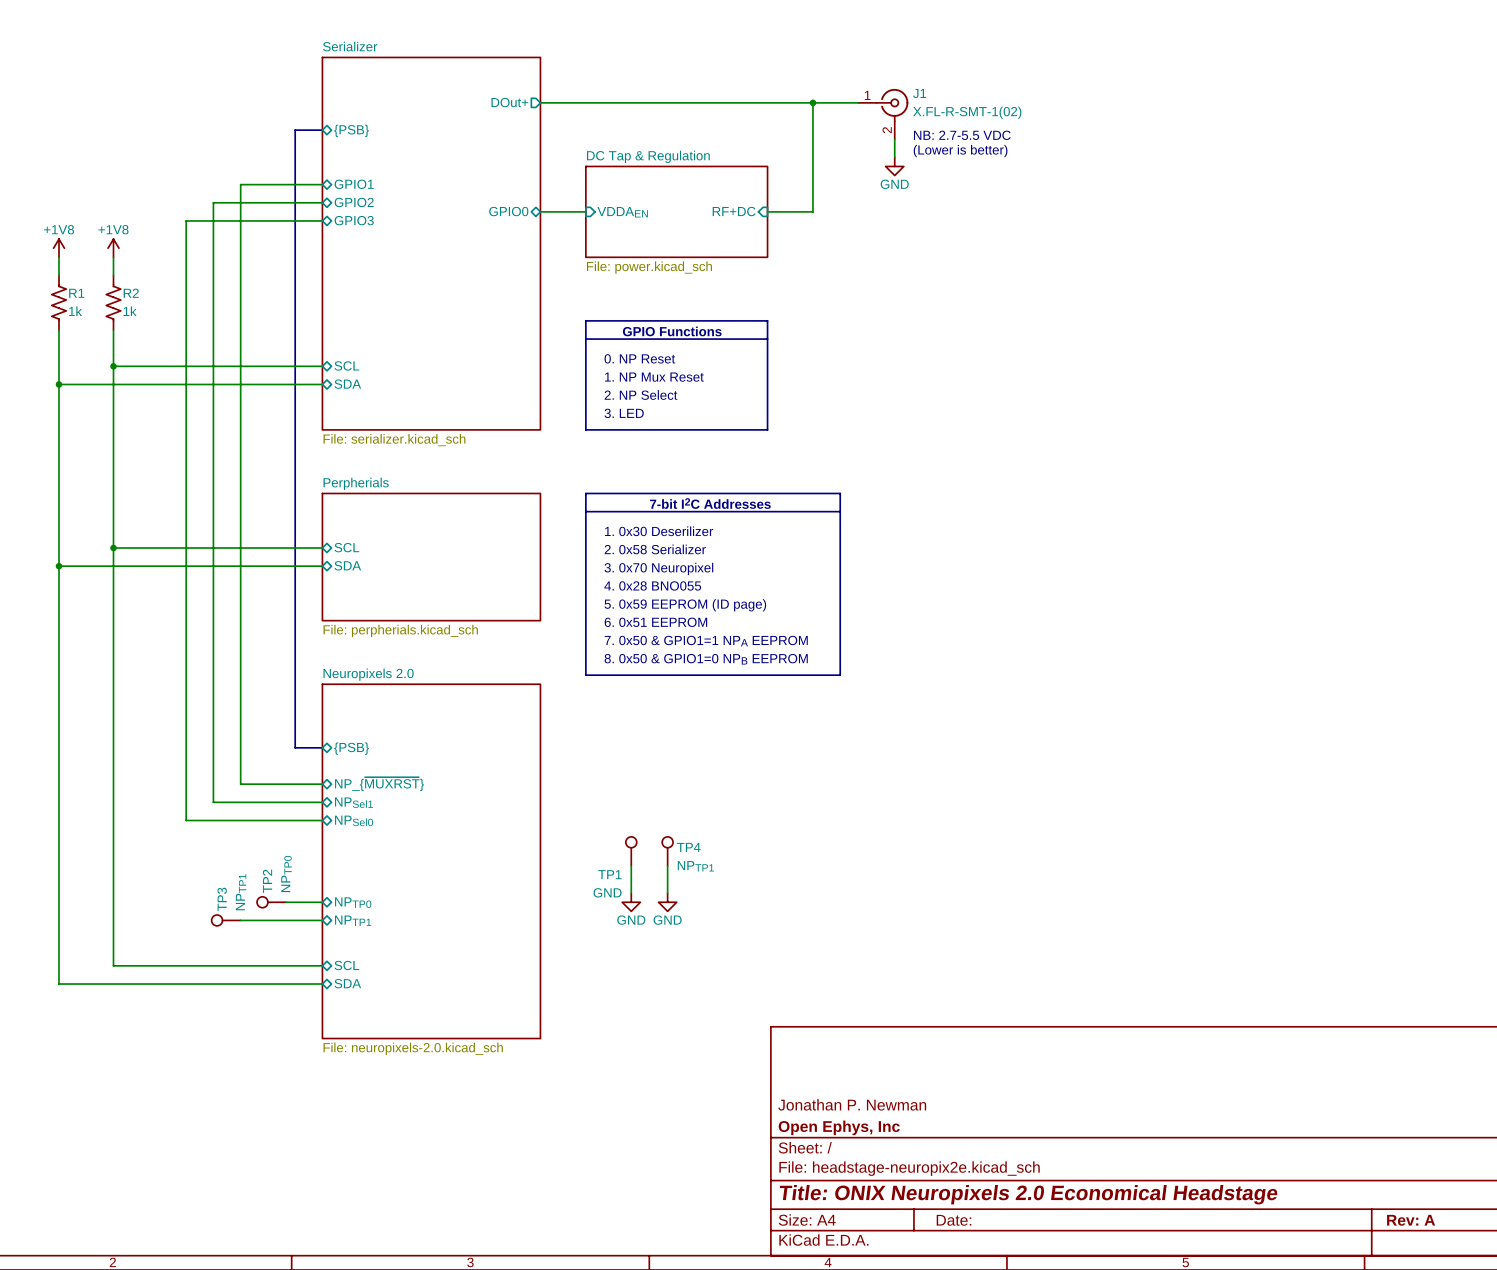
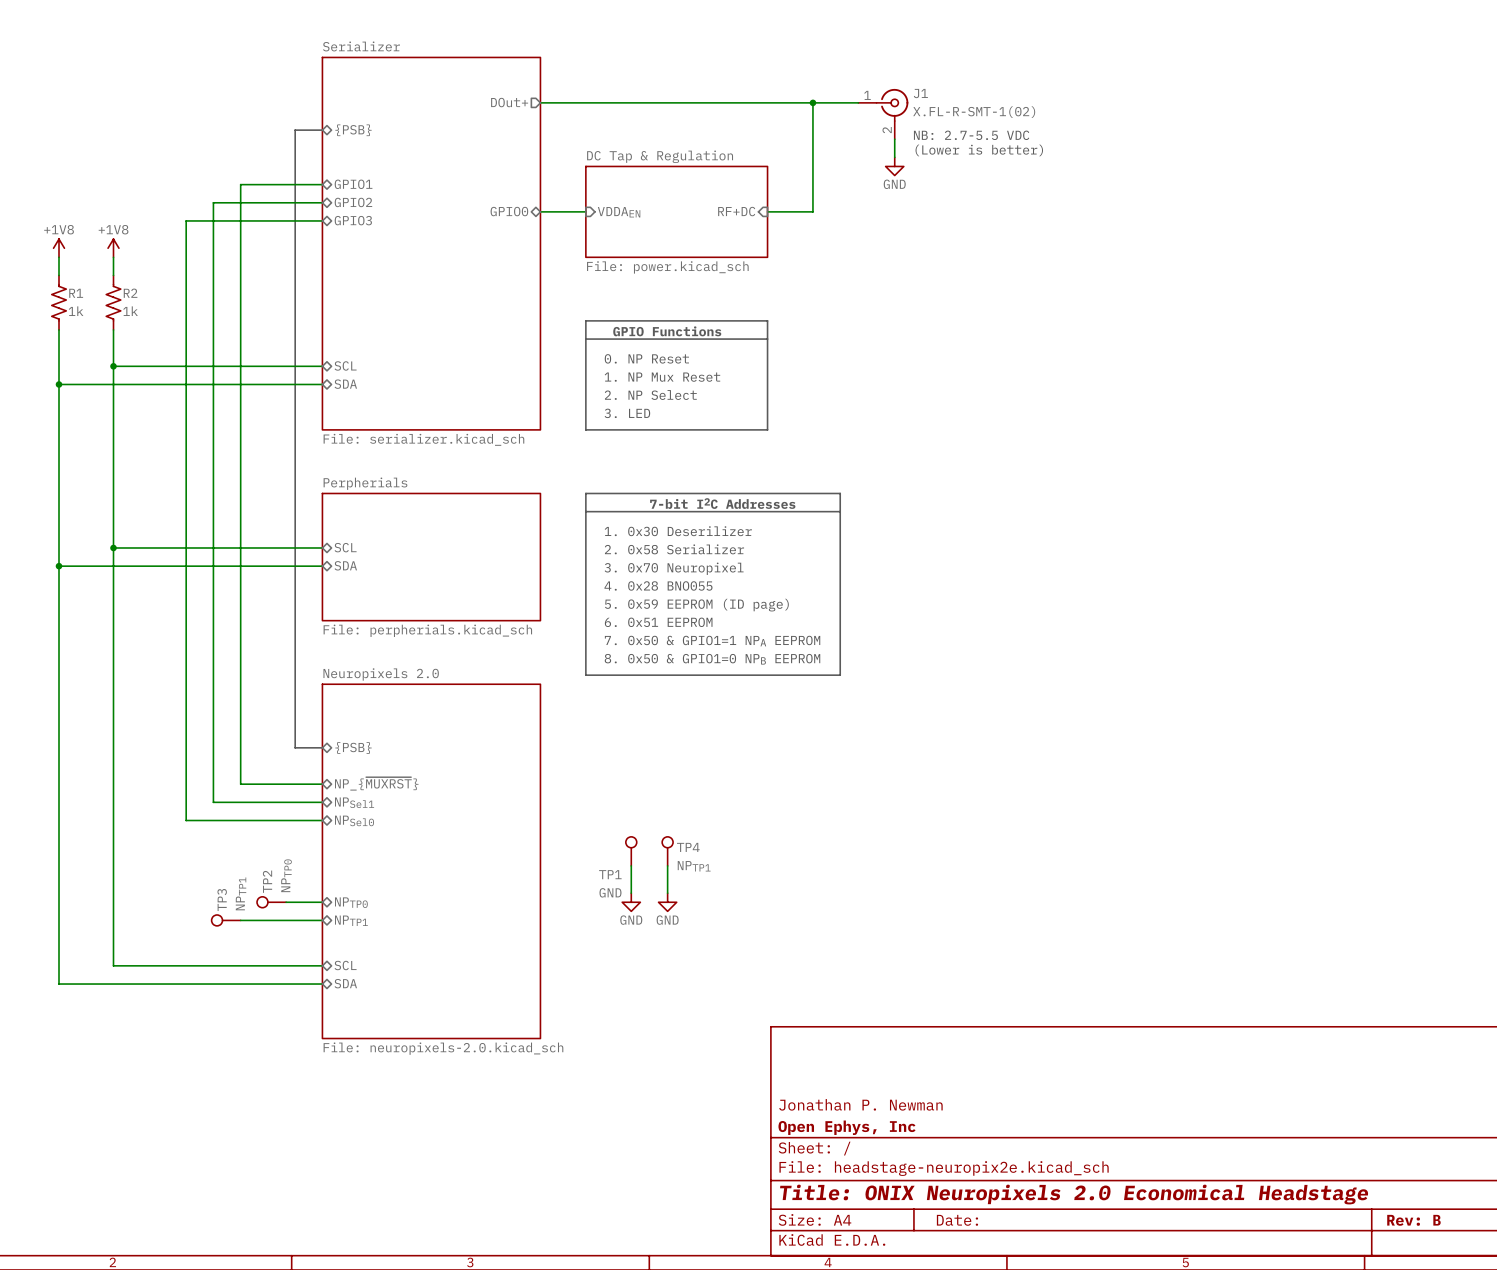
title block: Rev: A (1411, 1220) -> Rev: B (1413, 1220)

